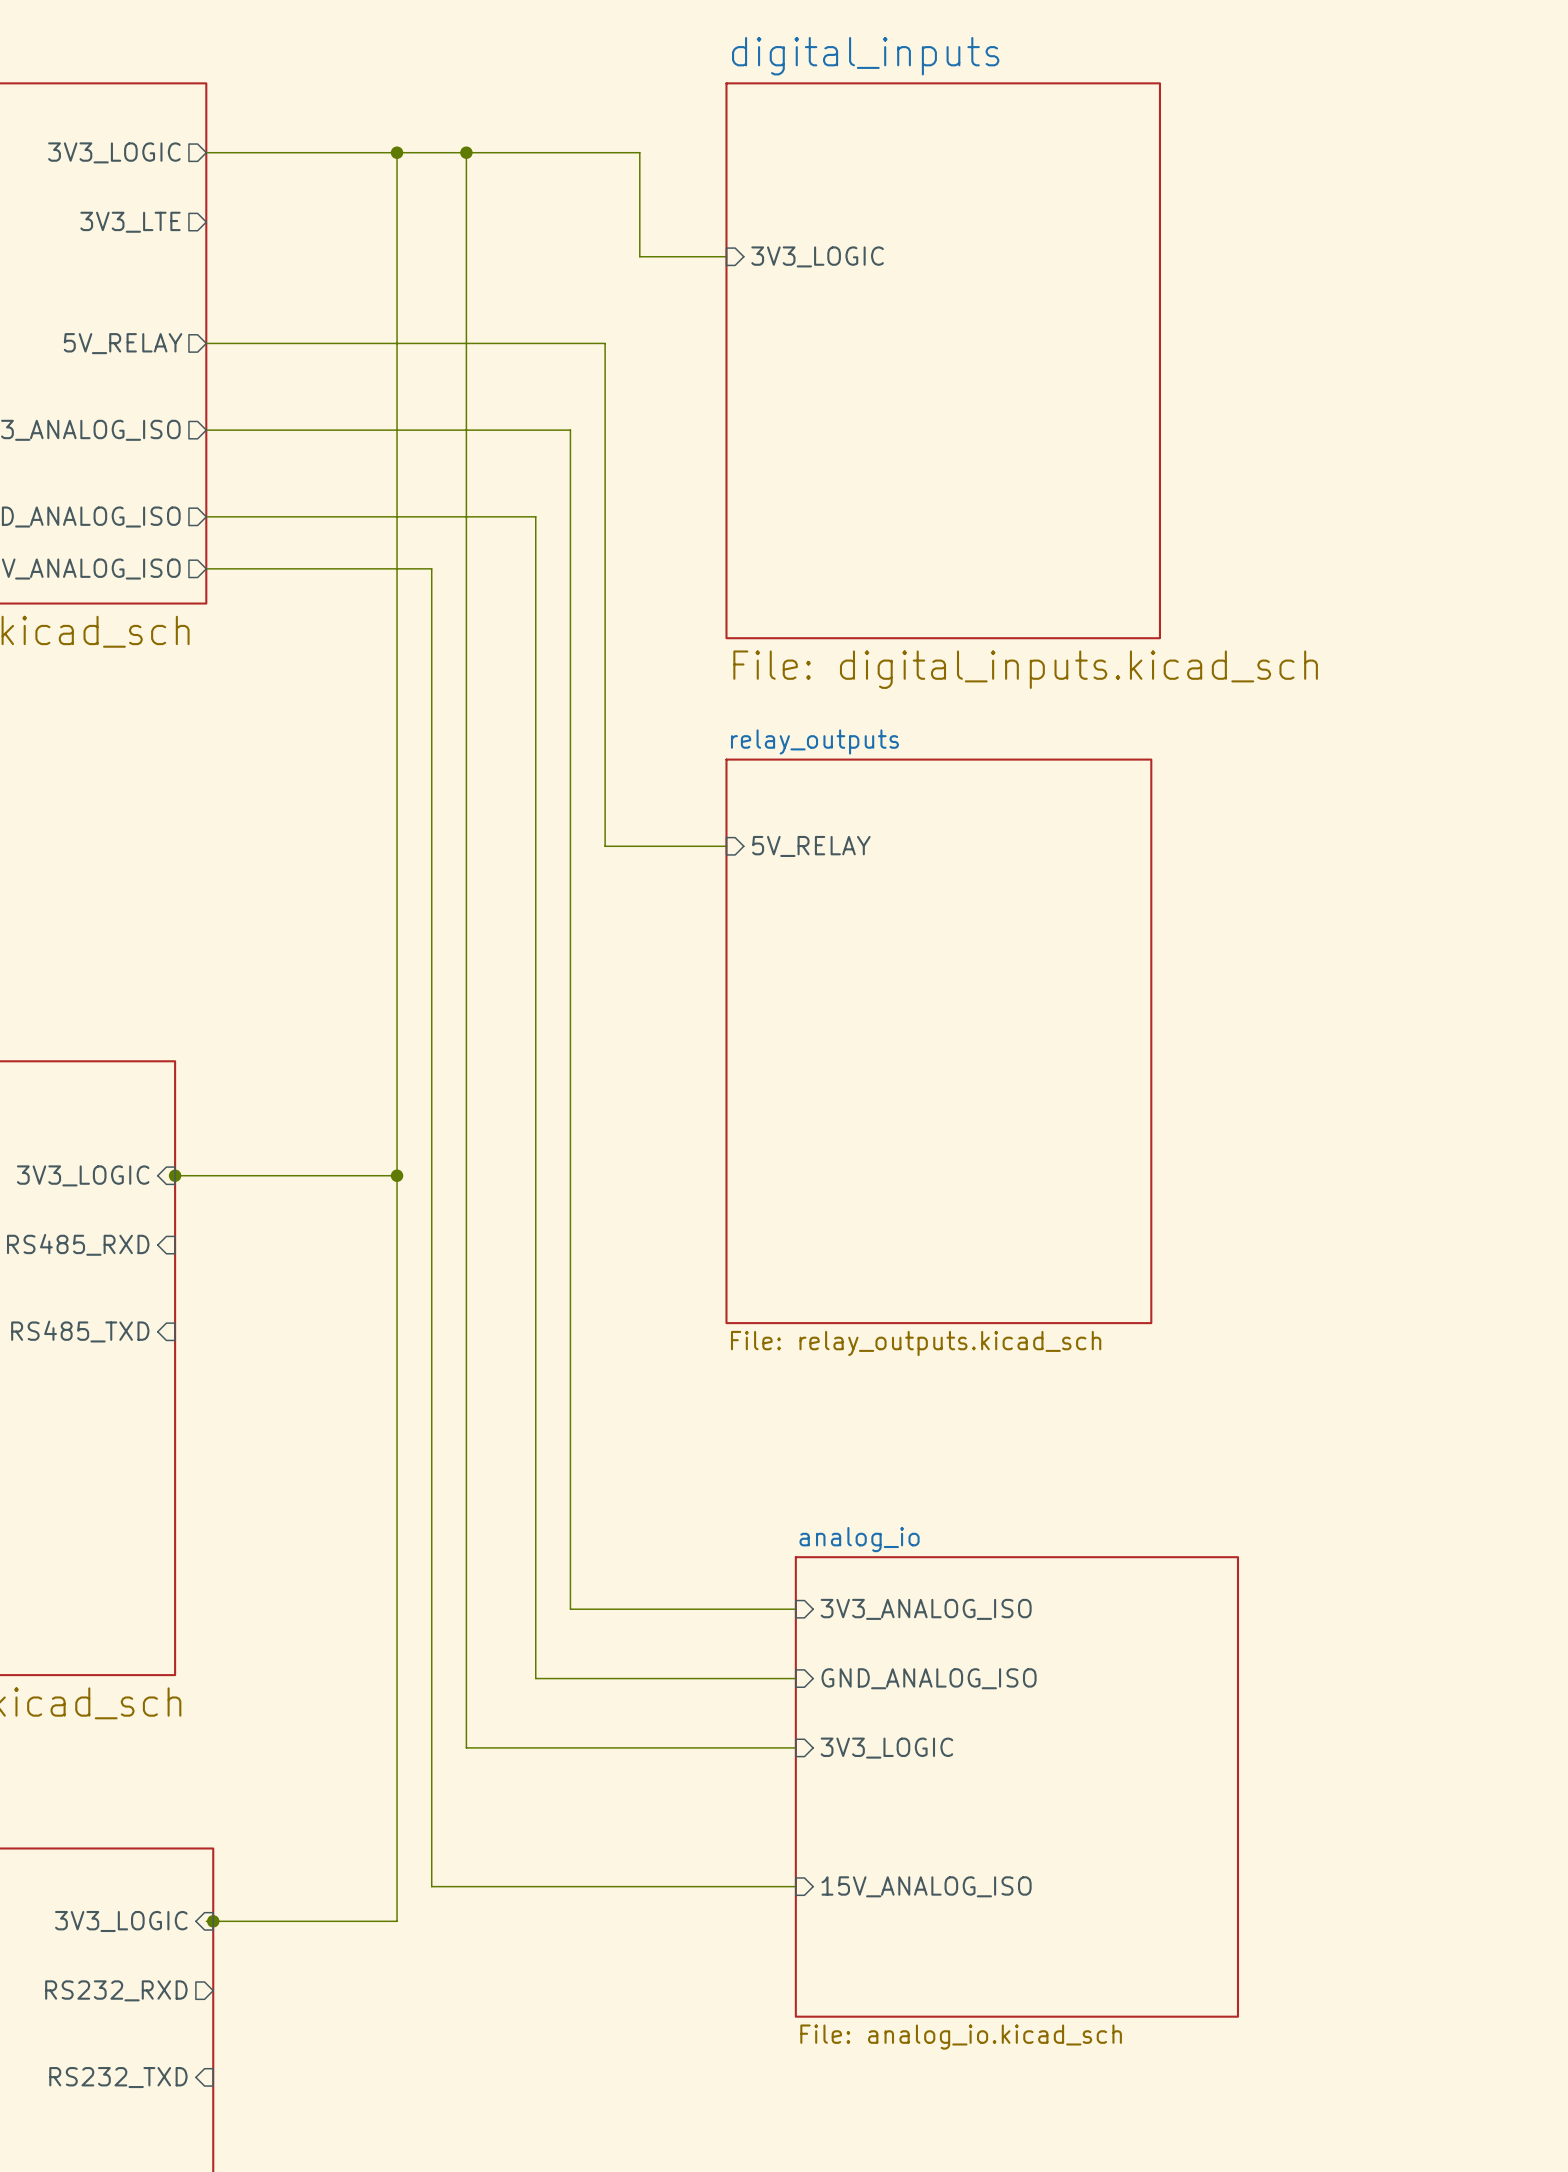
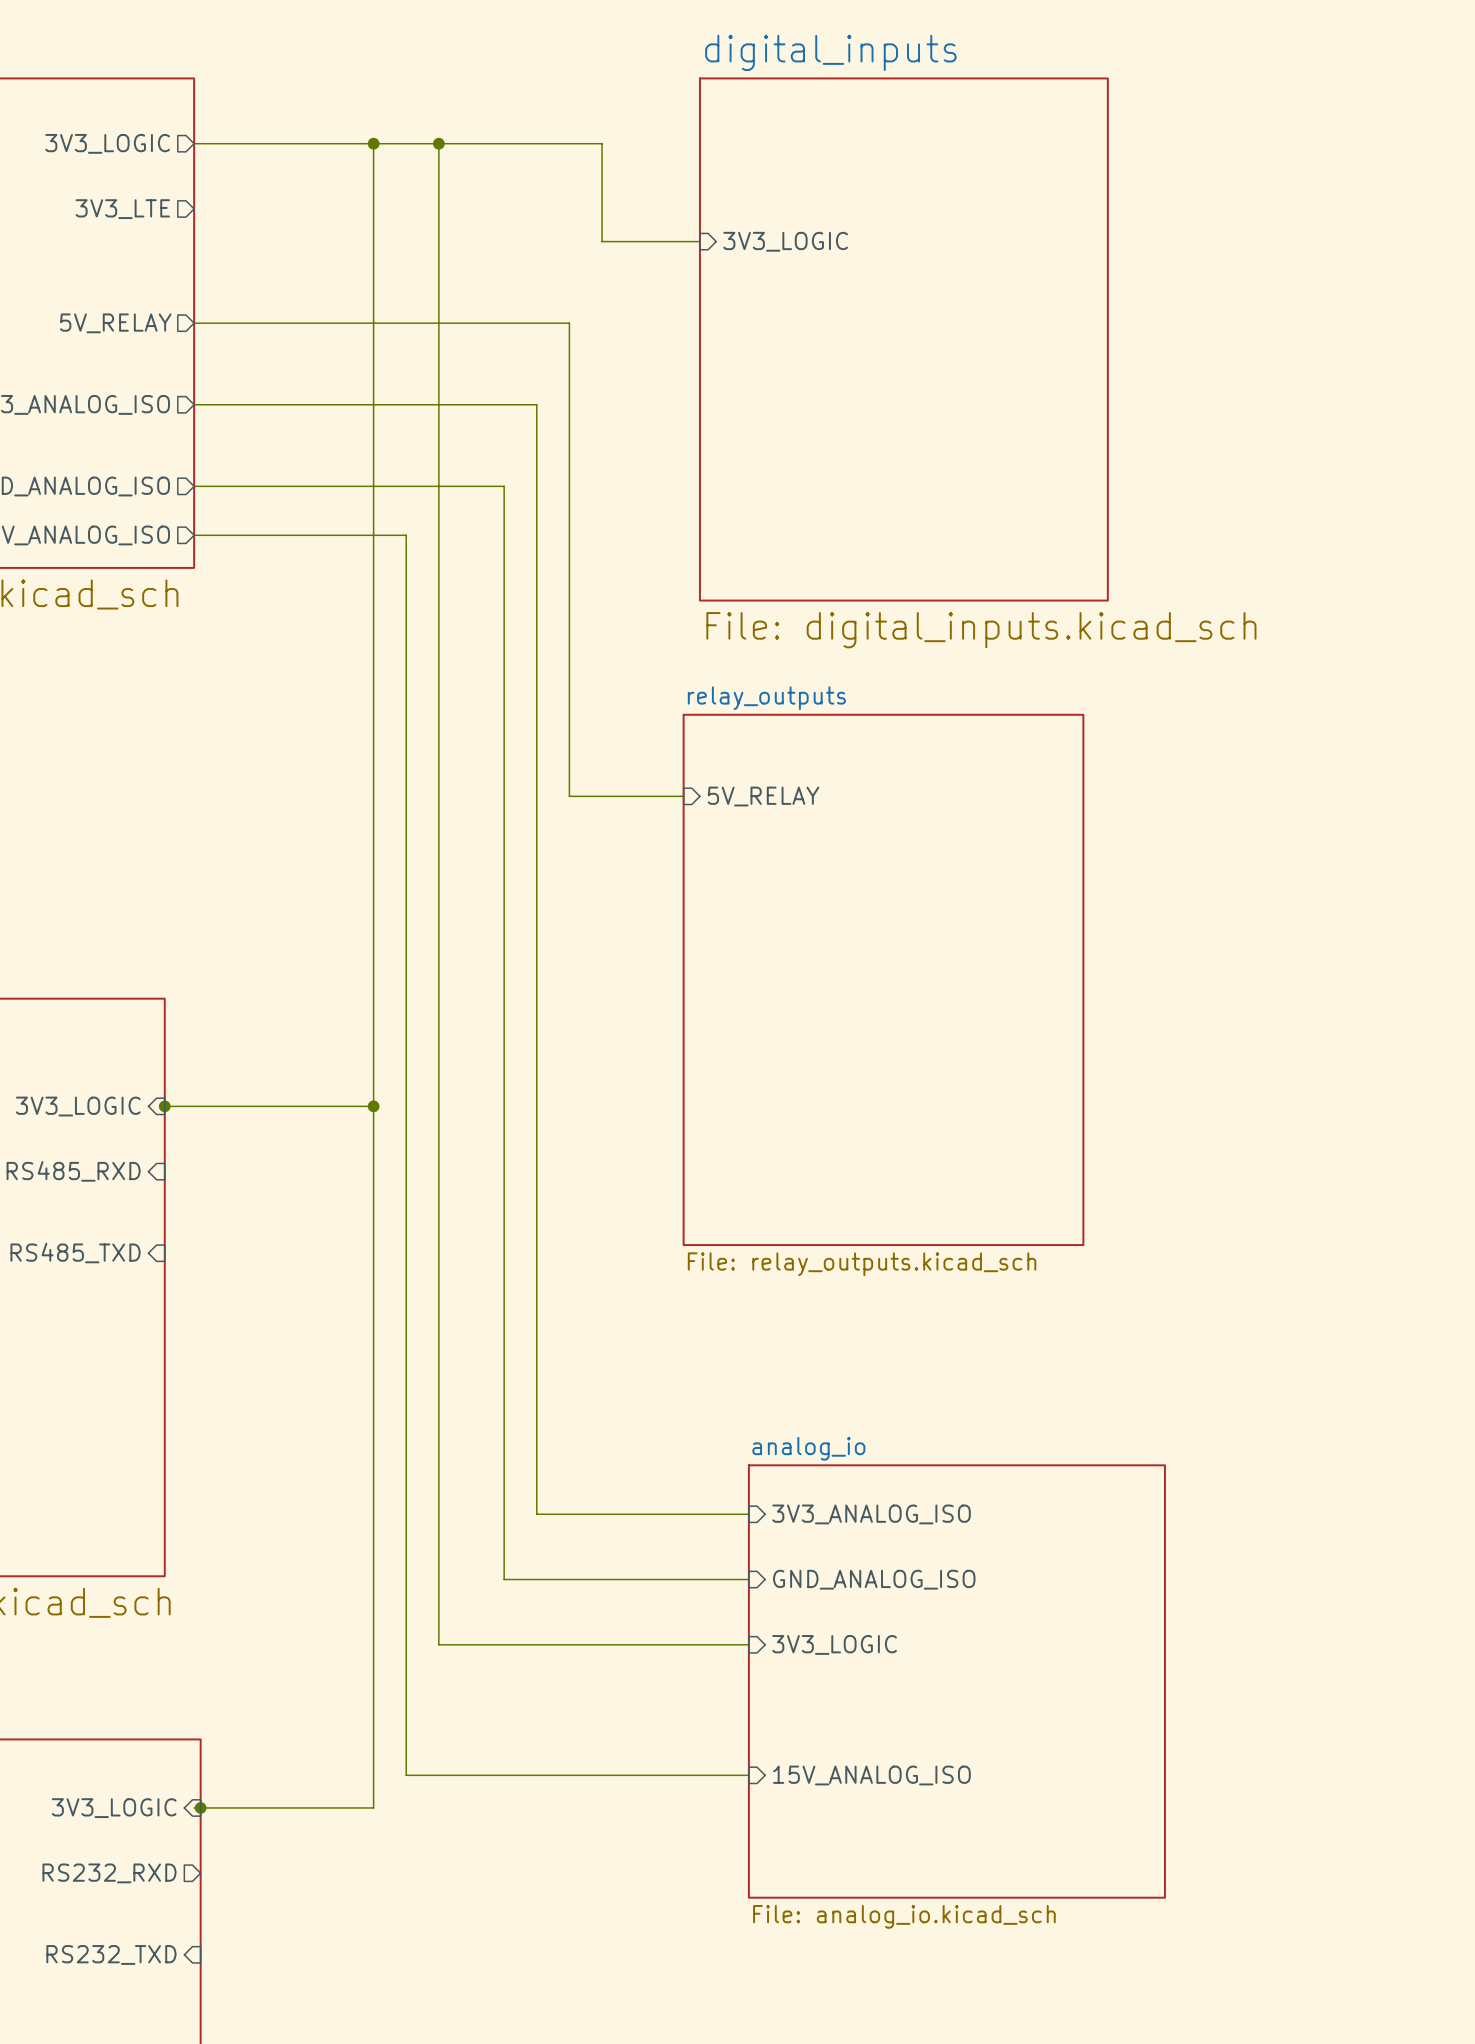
wire: none -> (683, 241) (699, 241)
sheet pin position: 3V3_LOGIC (817, 256) -> 3V3_LOGIC (785, 241)
sheet digital_inputs position: (943, 360) -> (903, 339)

